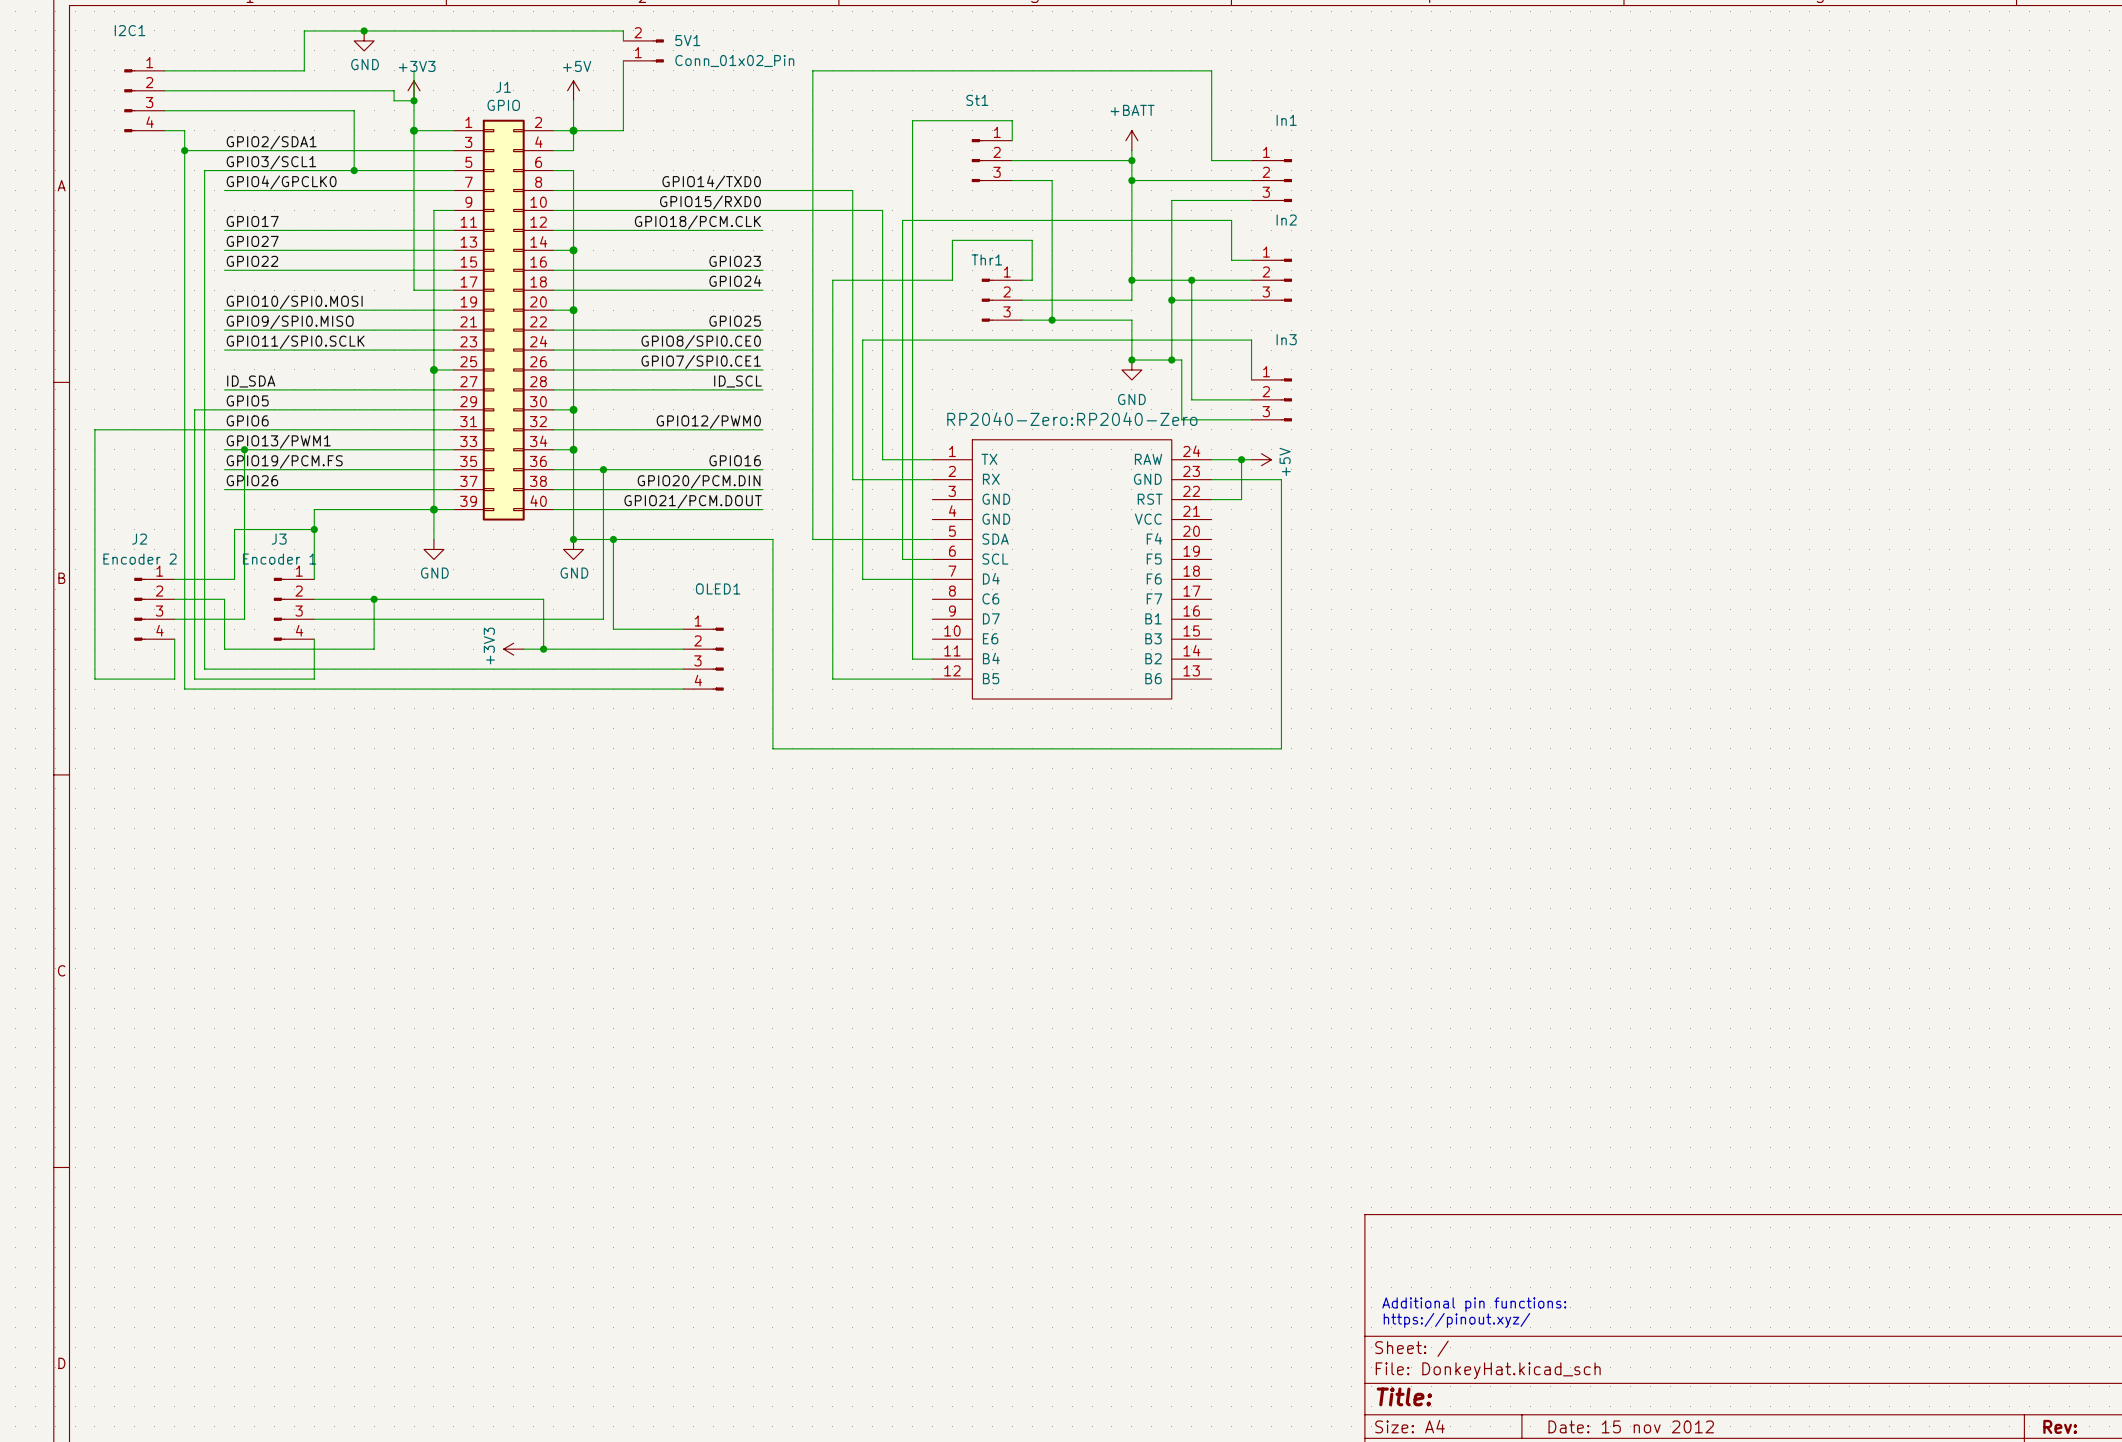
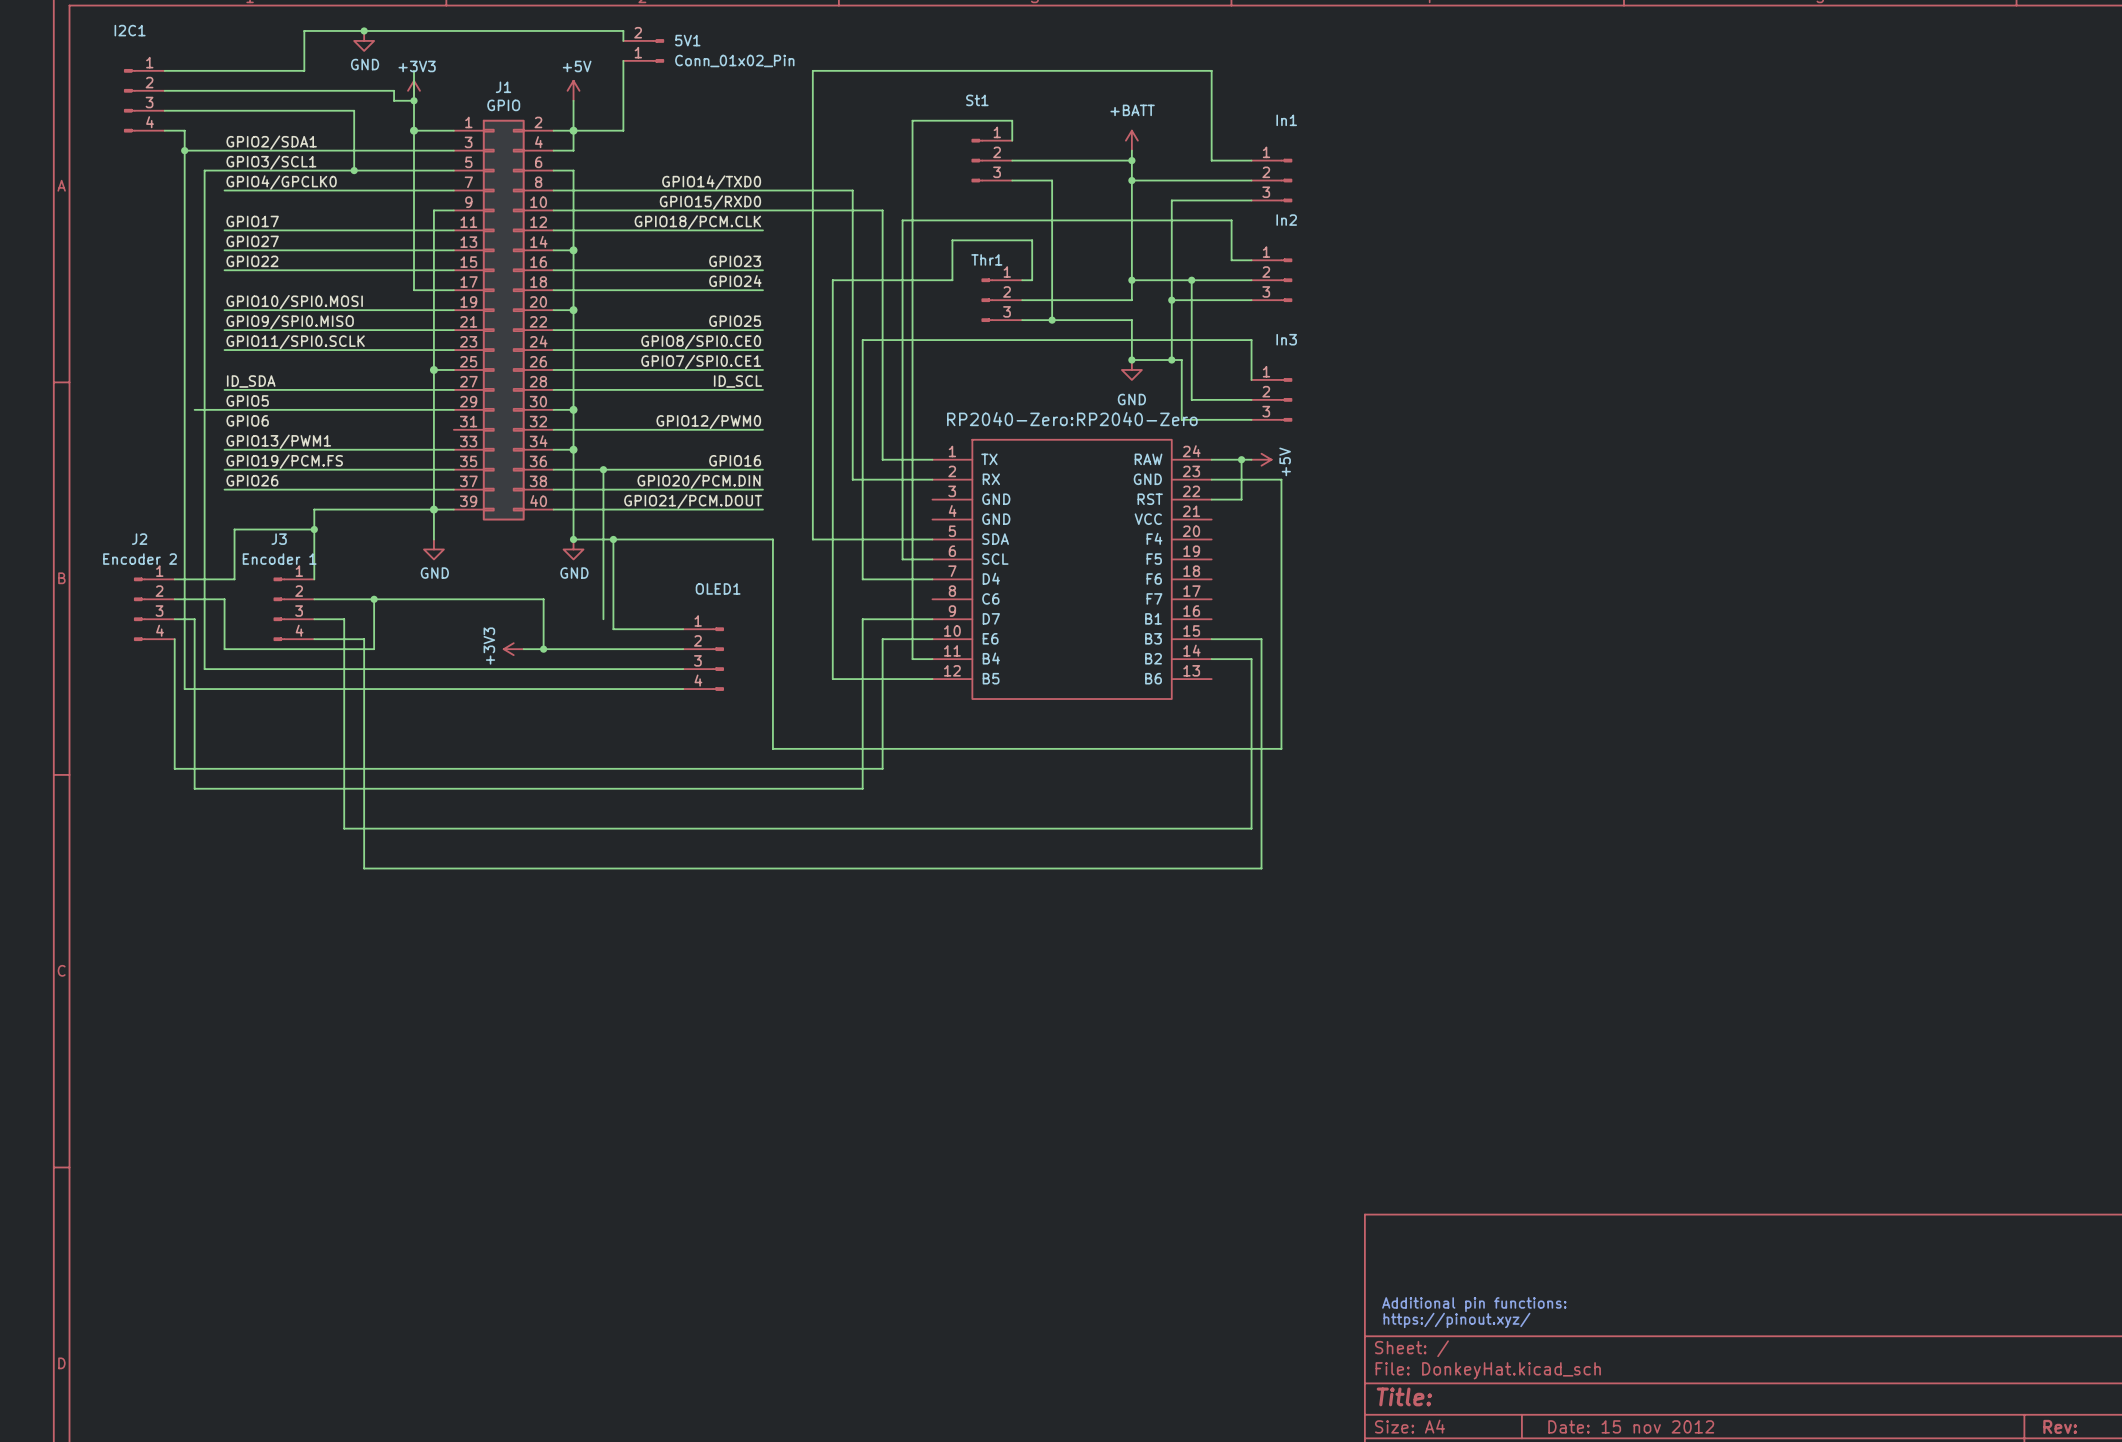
wire: (194, 409) (194, 619) (244, 619) (244, 449) -> none
wire: (453, 429) (94, 429) (94, 679) (174, 679) -> (932, 639) (882, 639) (882, 768) (174, 768) (174, 679)
junction: (244, 449) -> none
wire: (344, 619) (603, 619) -> (344, 619) (344, 828) (1251, 828) (1251, 659) (1211, 659)
wire: (314, 639) (314, 679) (194, 679) -> (932, 619) (862, 619) (862, 788) (194, 788) (194, 679)
wire: none -> (314, 639) (364, 639) (364, 868) (1261, 868) (1261, 639) (1211, 639)

